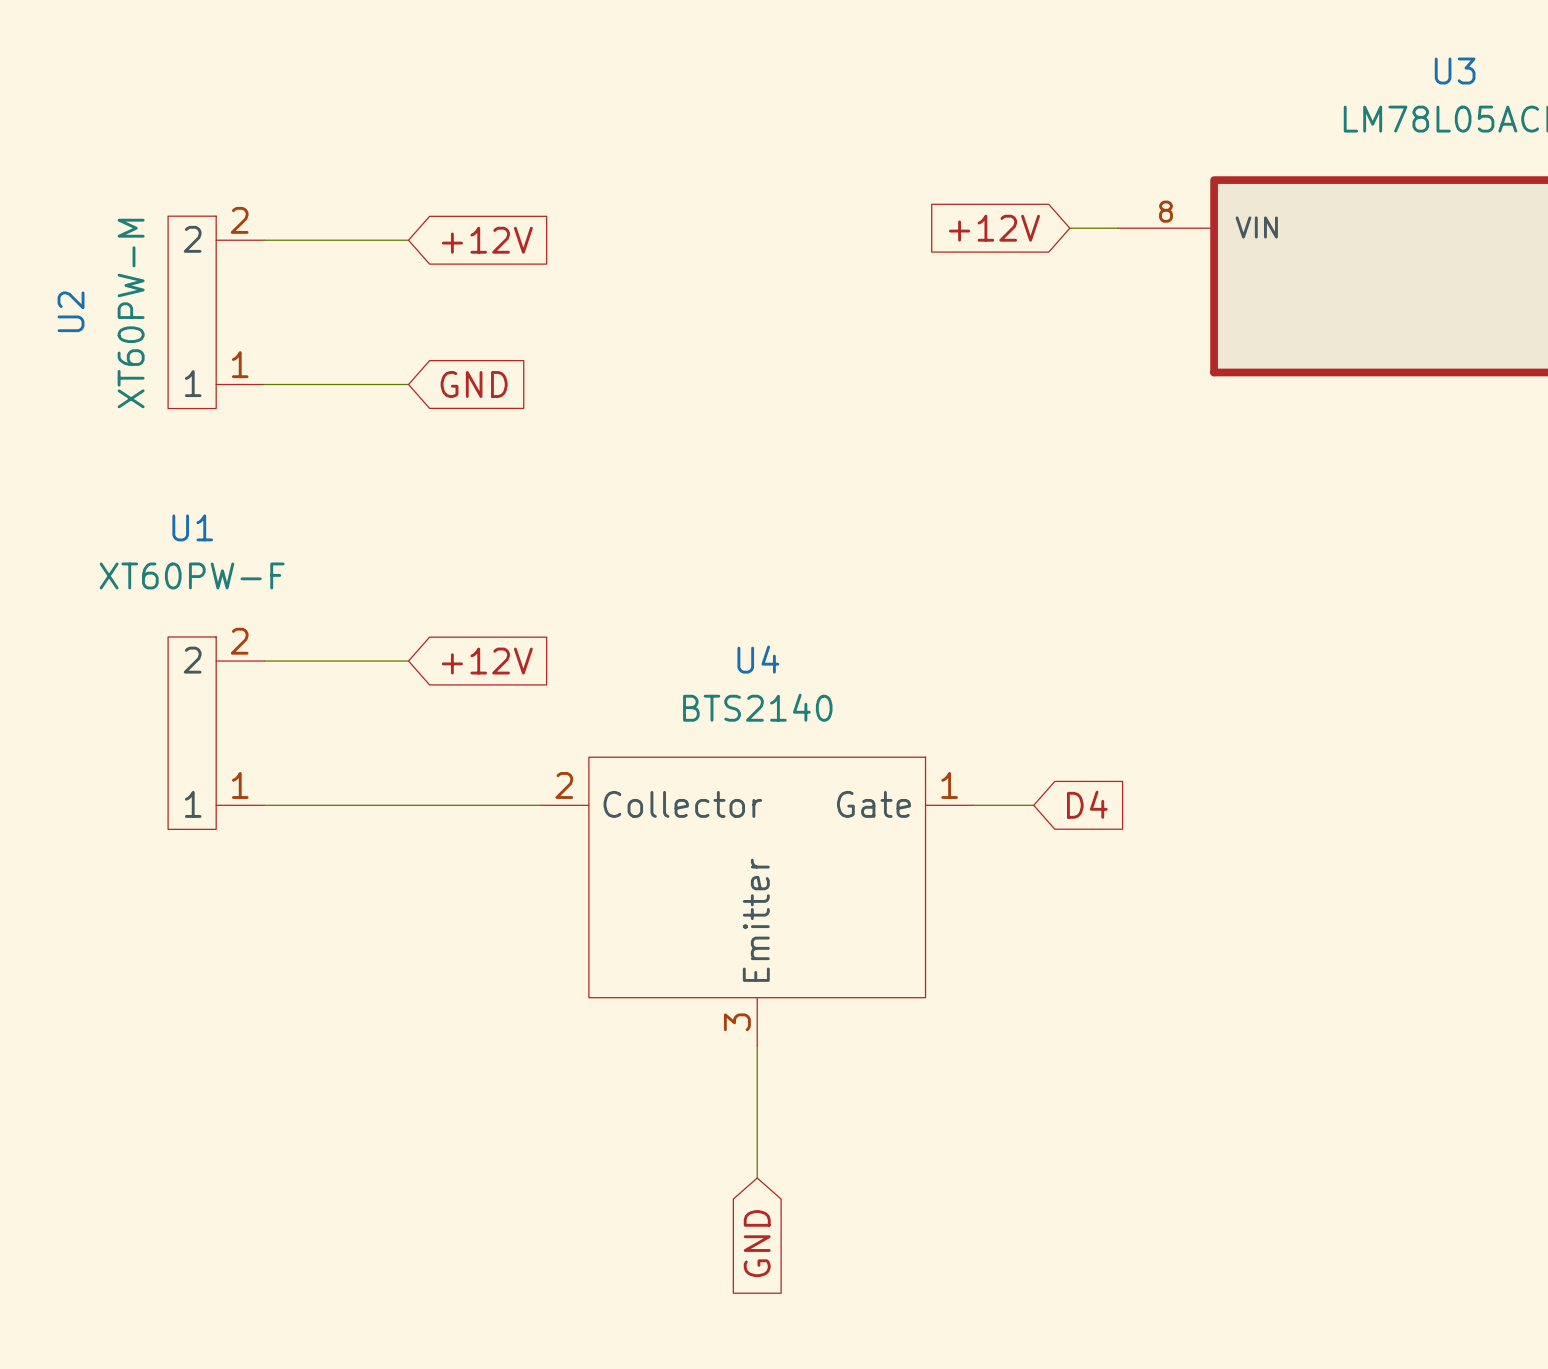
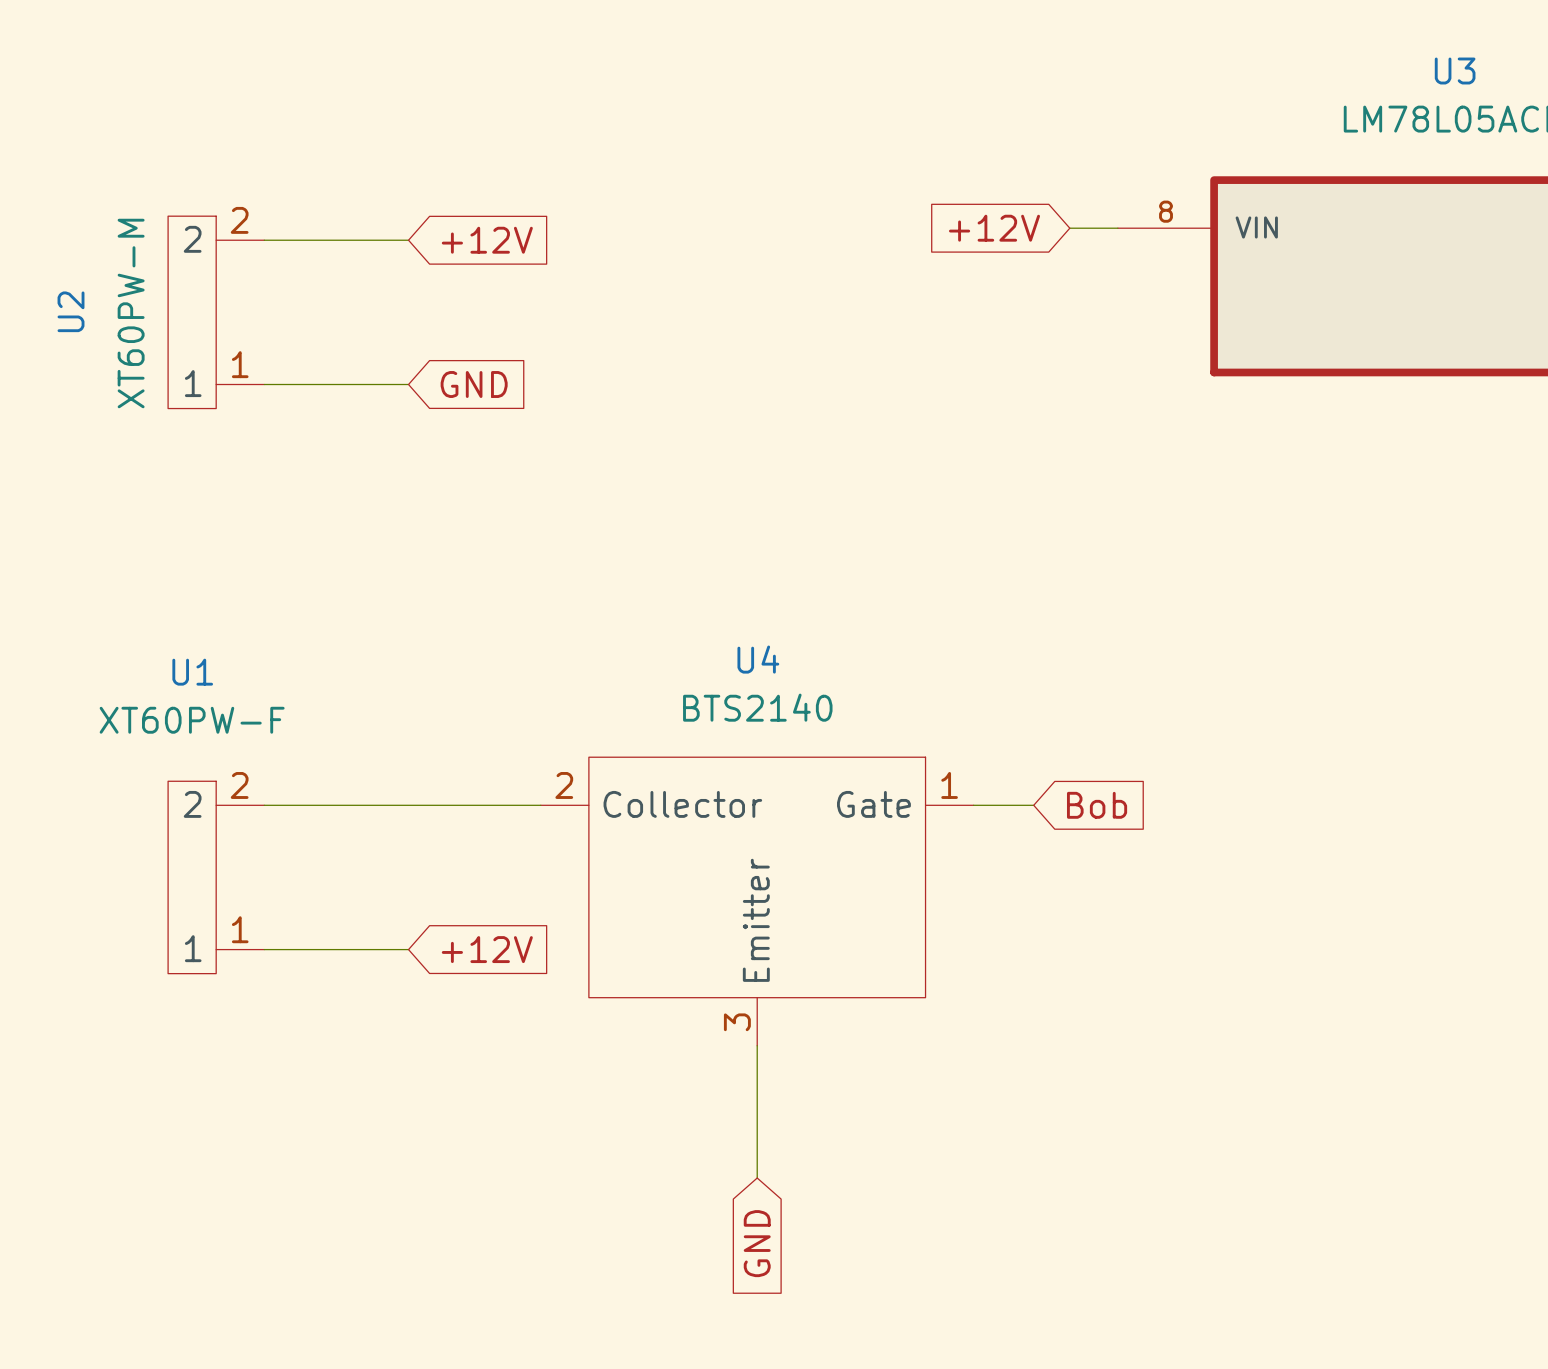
wire: (264, 661) (408, 661) -> (264, 949) (408, 949)
global label position: +12V (487, 661) -> +12V (487, 949)
U1 position: (216, 733) -> (216, 877)
global label: D4 (1087, 804) -> Bob (1097, 805)

